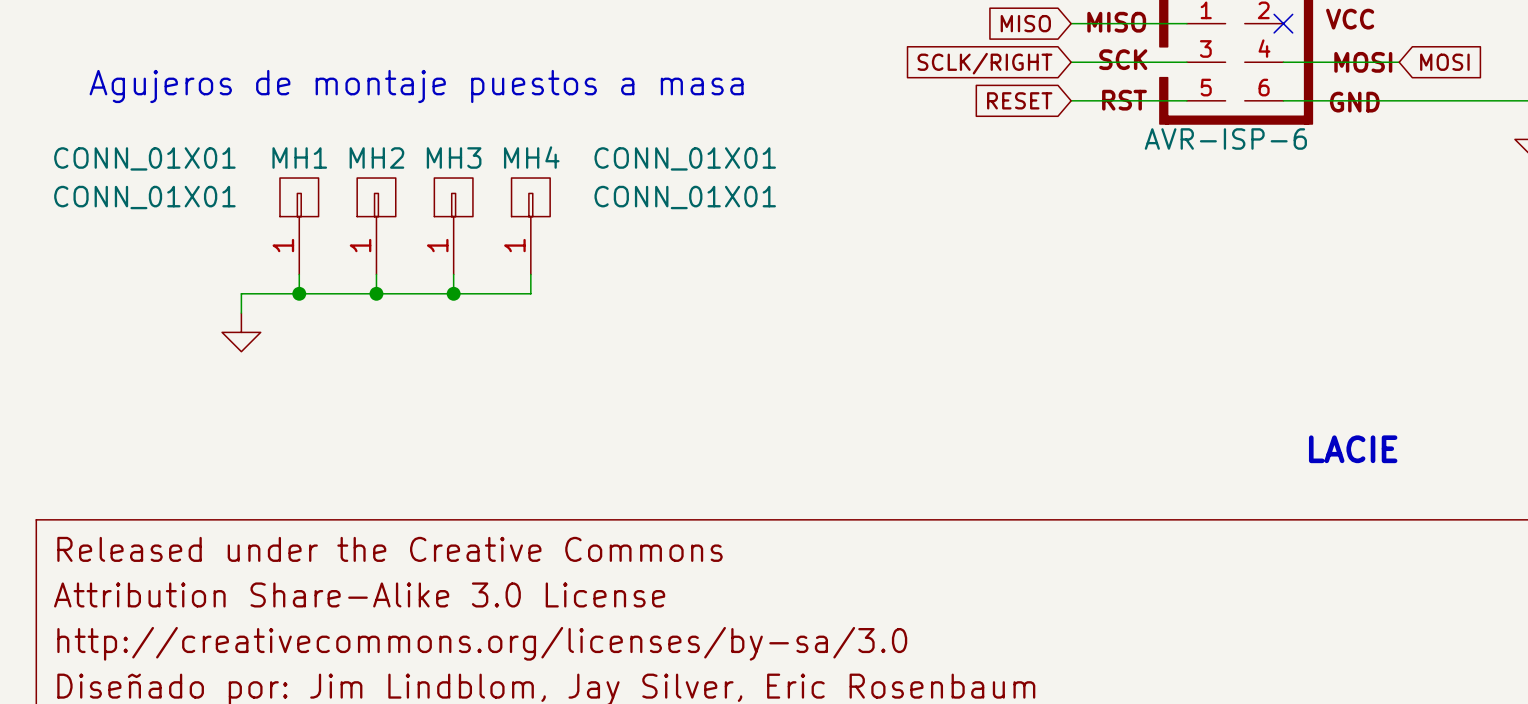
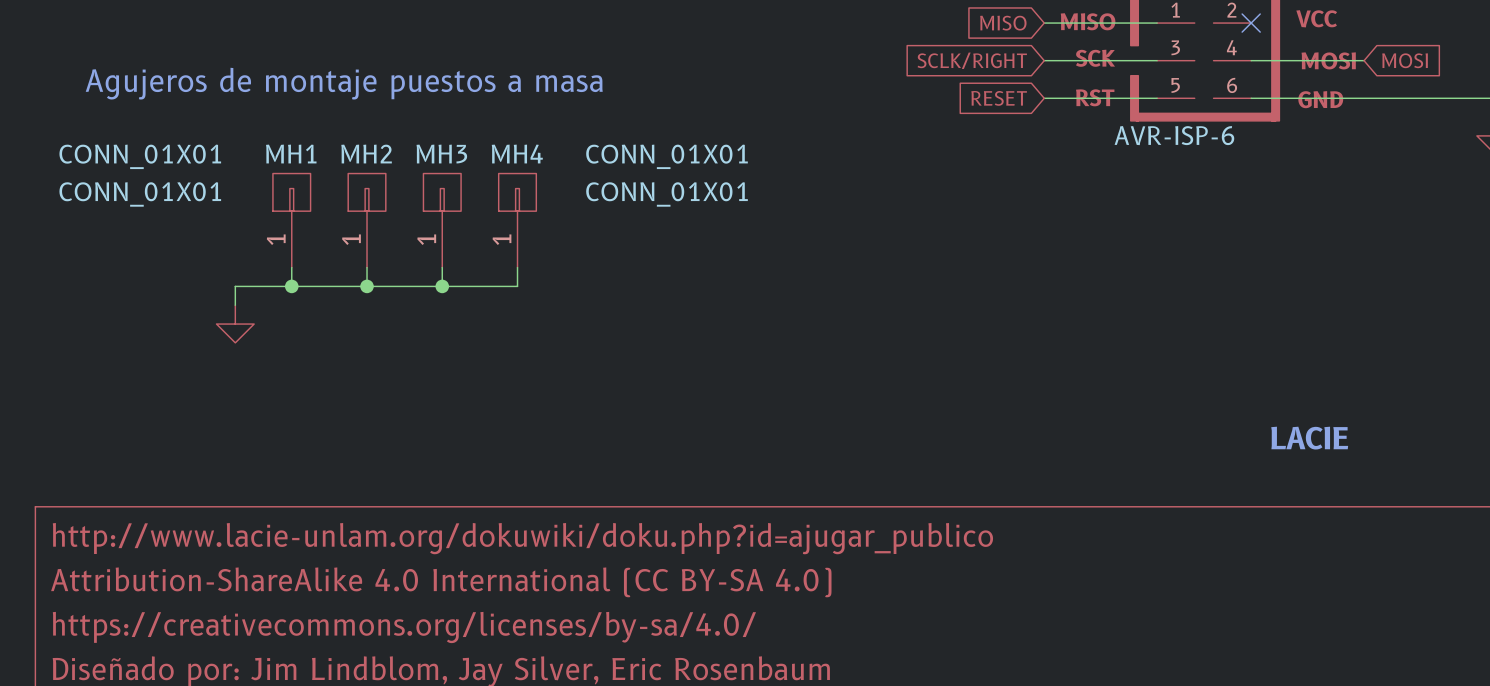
title block: Released under the Creative Commons (390, 549) -> http://www.lacie-unlam.org/dokuwiki/doku.php?id=ajugar_publico (522, 538)
title block: Attribution Share-Alike 3.0 License (359, 594) -> Attribution-ShareAlike 4.0 International (CC BY-SA 4.0) (441, 582)
title block: http://creativecommons.org/licenses/by-sa/3.0 (482, 643) -> https://creativecommons.org/licenses/by-sa/4.0/ (404, 627)

